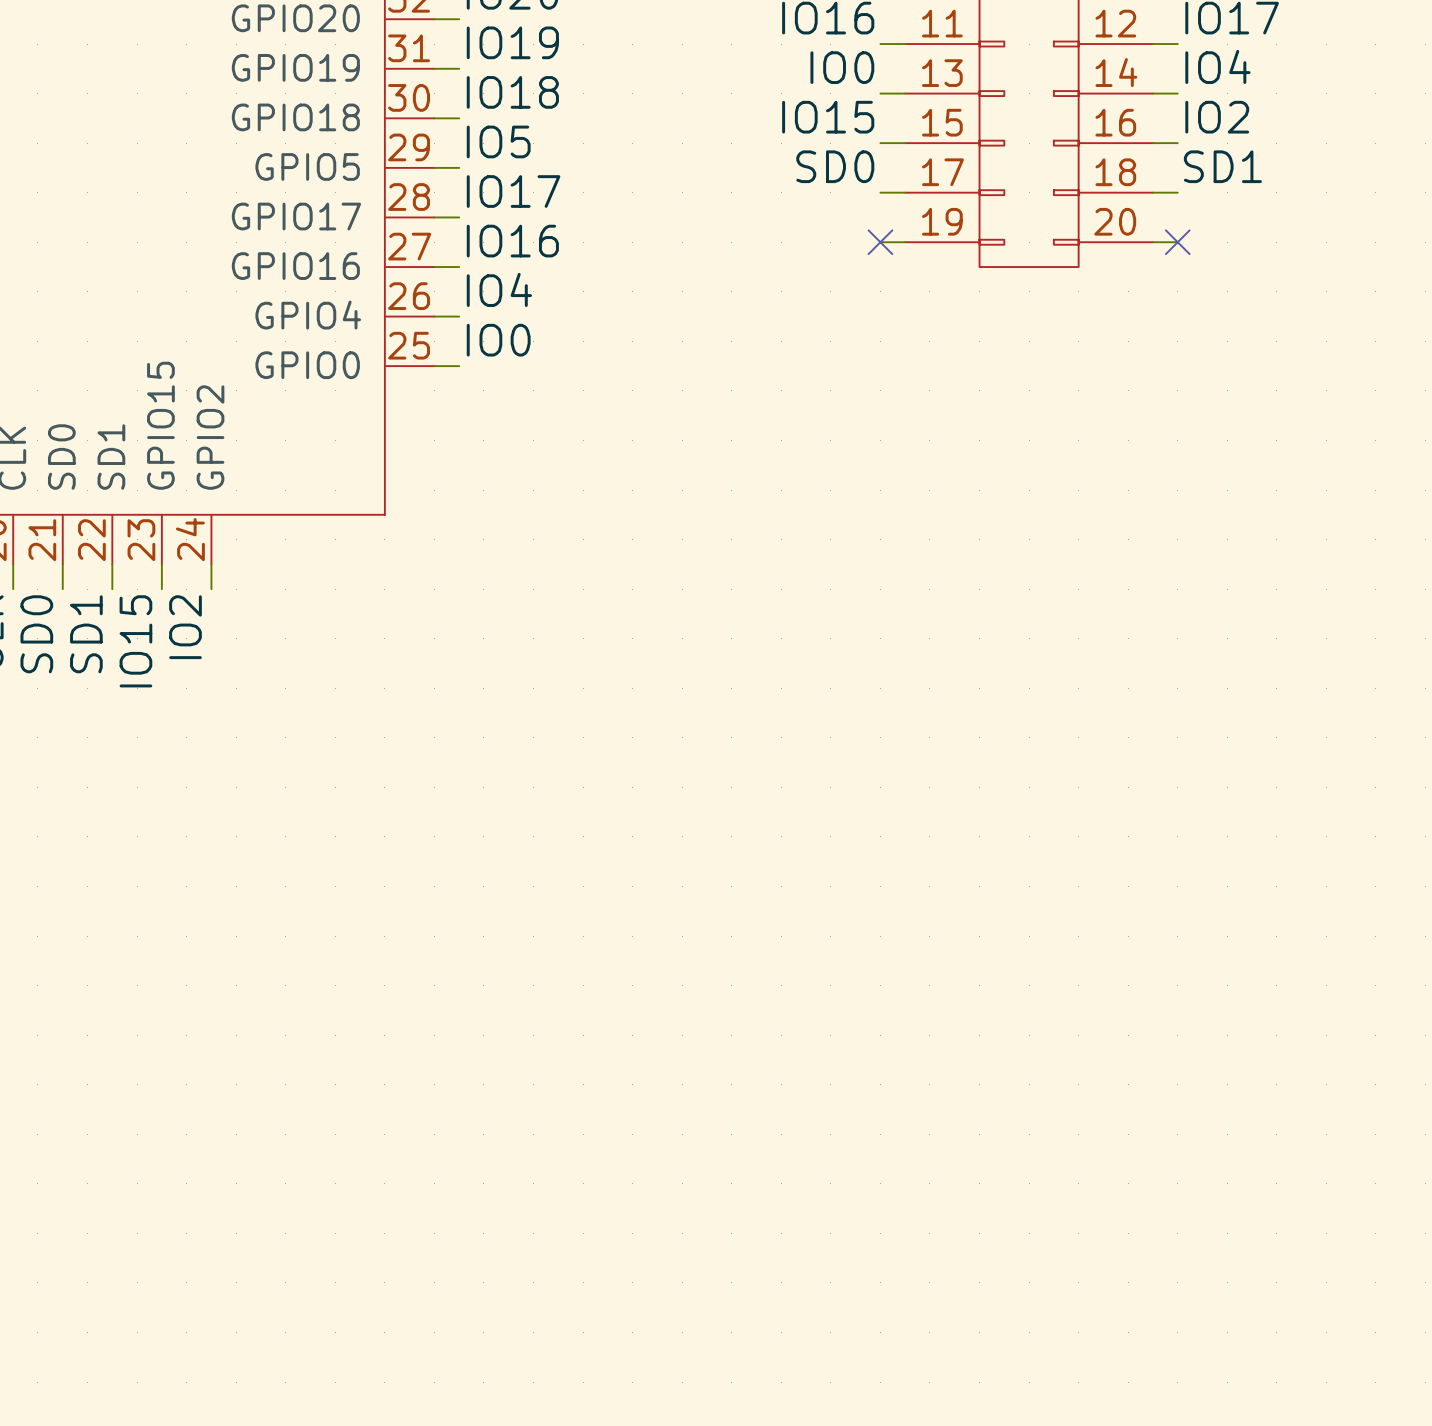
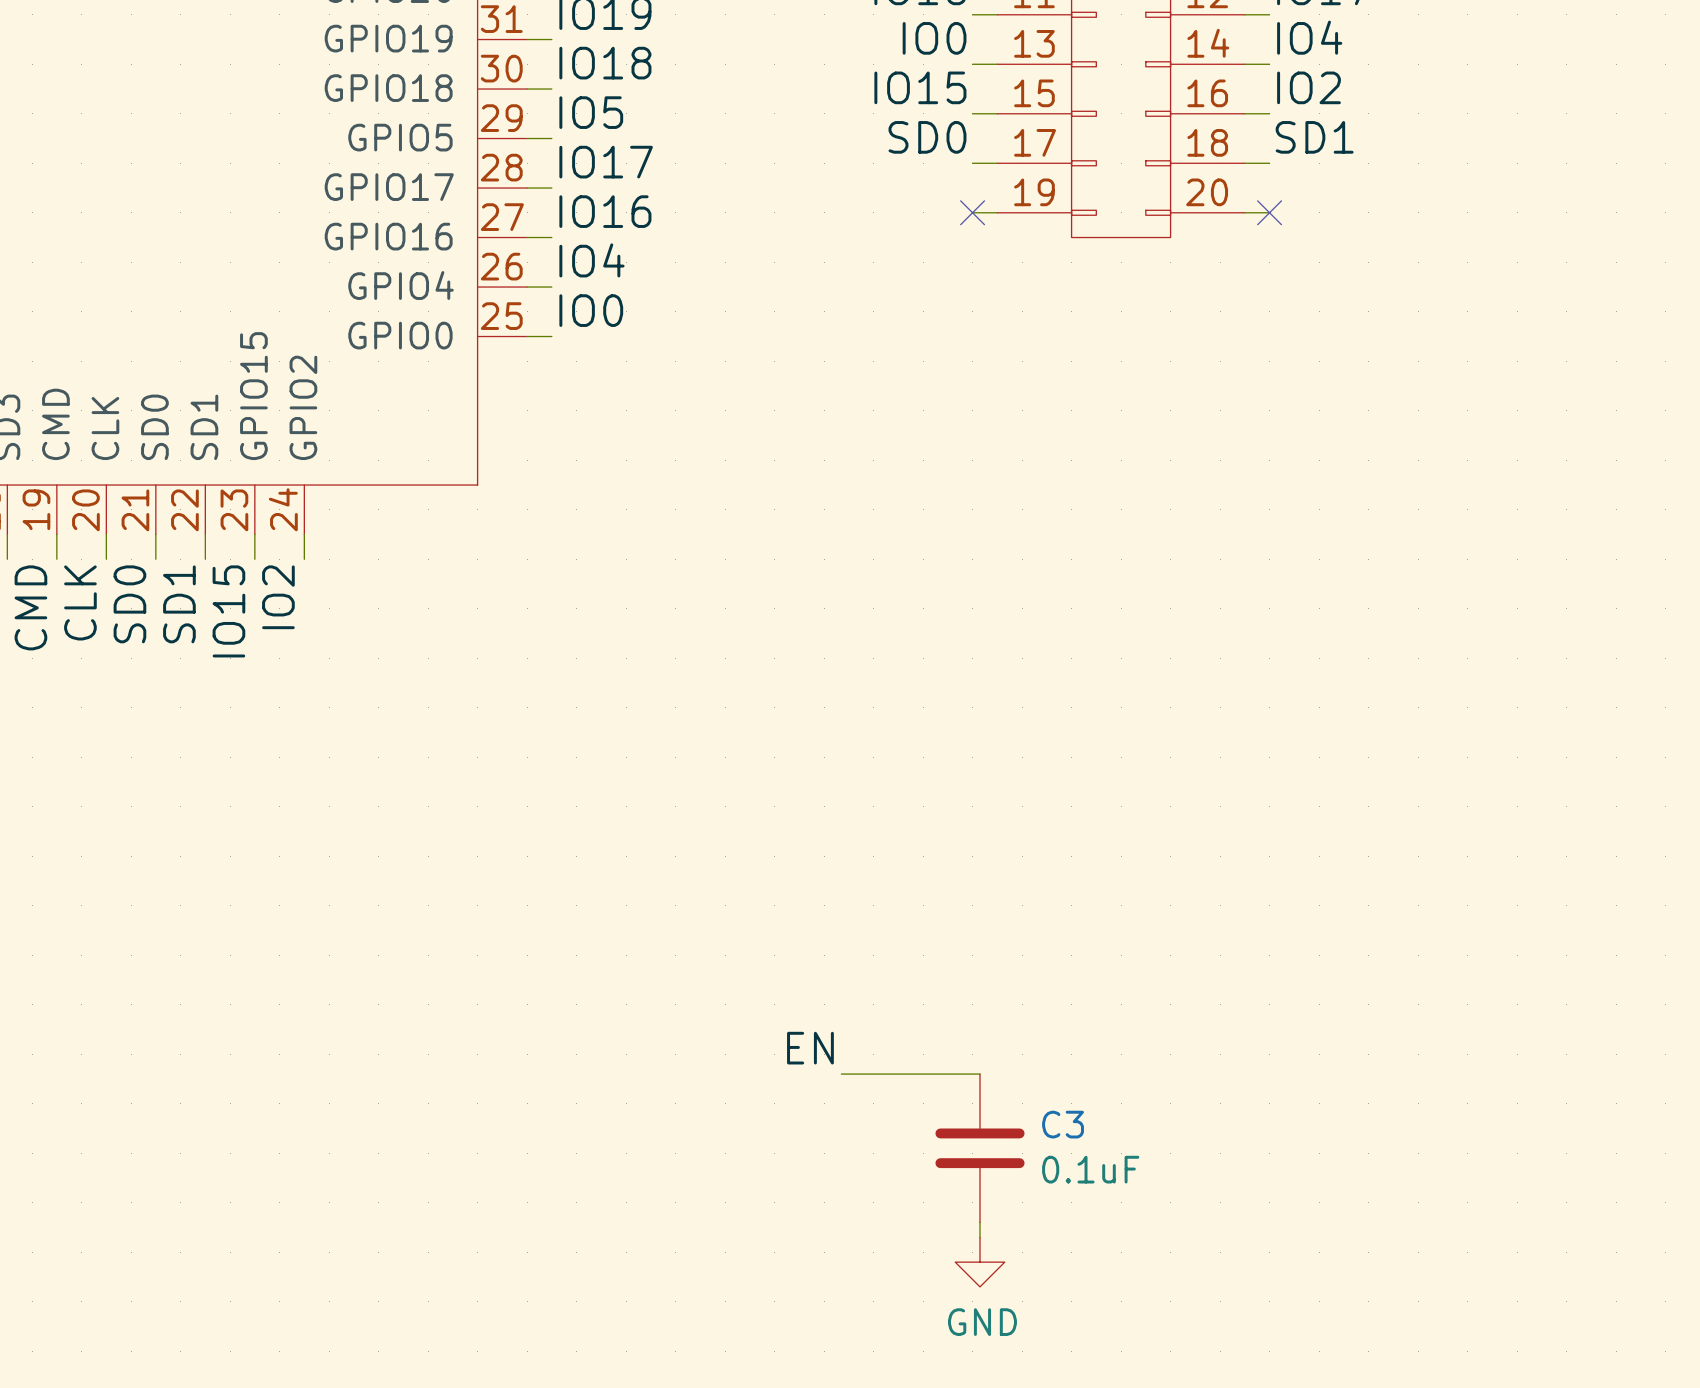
label: none -> EN (810, 1048)
wire: none -> (841, 1074) (980, 1074)
C3: none -> 0.1uF (980, 1148)
wire: none -> (980, 1222) (980, 1237)
power symbol: none -> GND (980, 1262)

